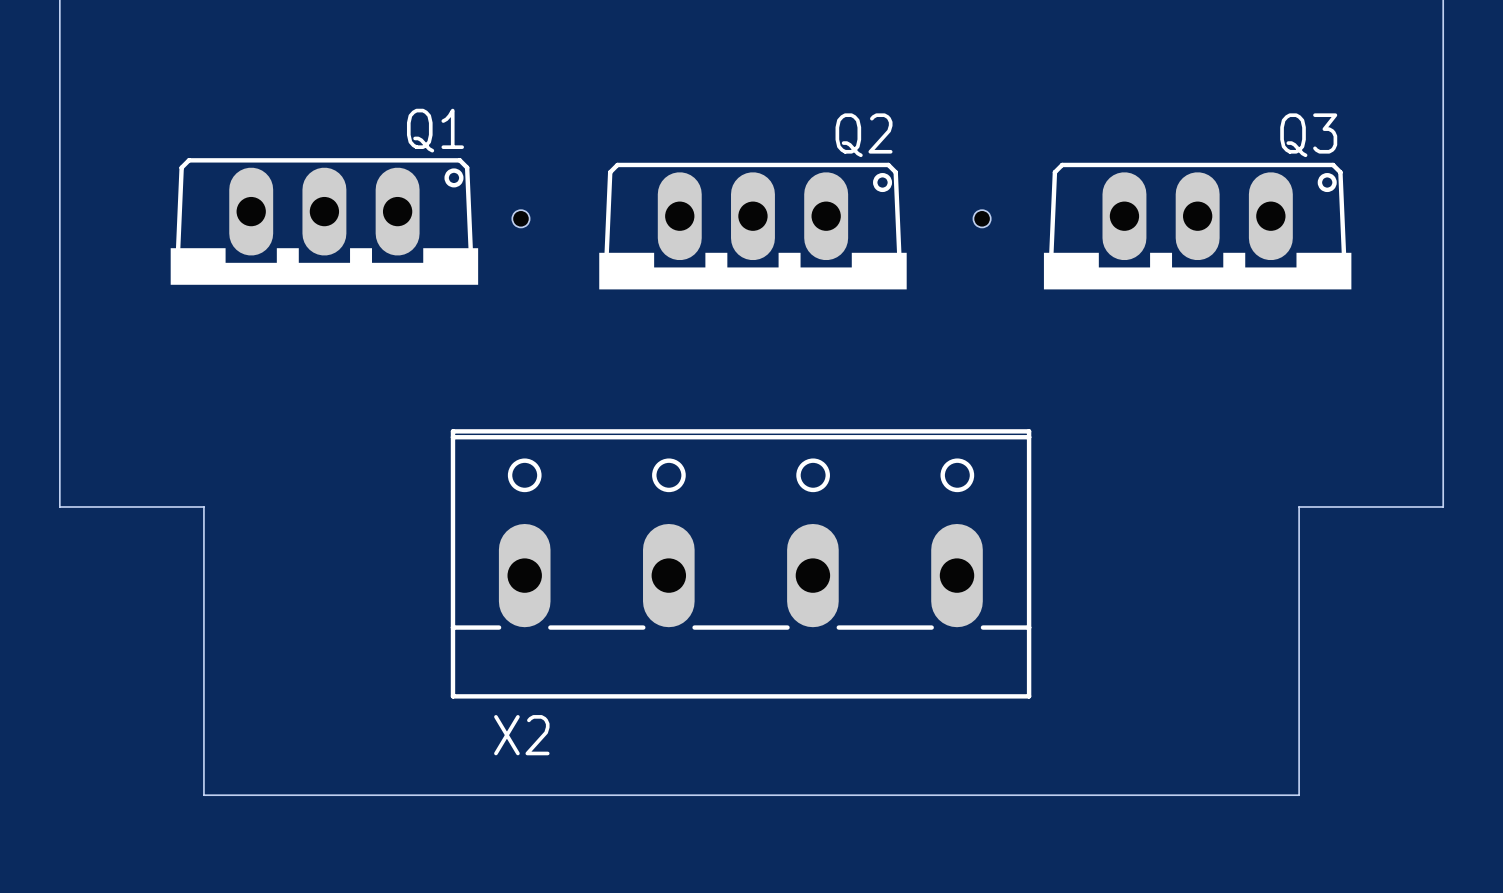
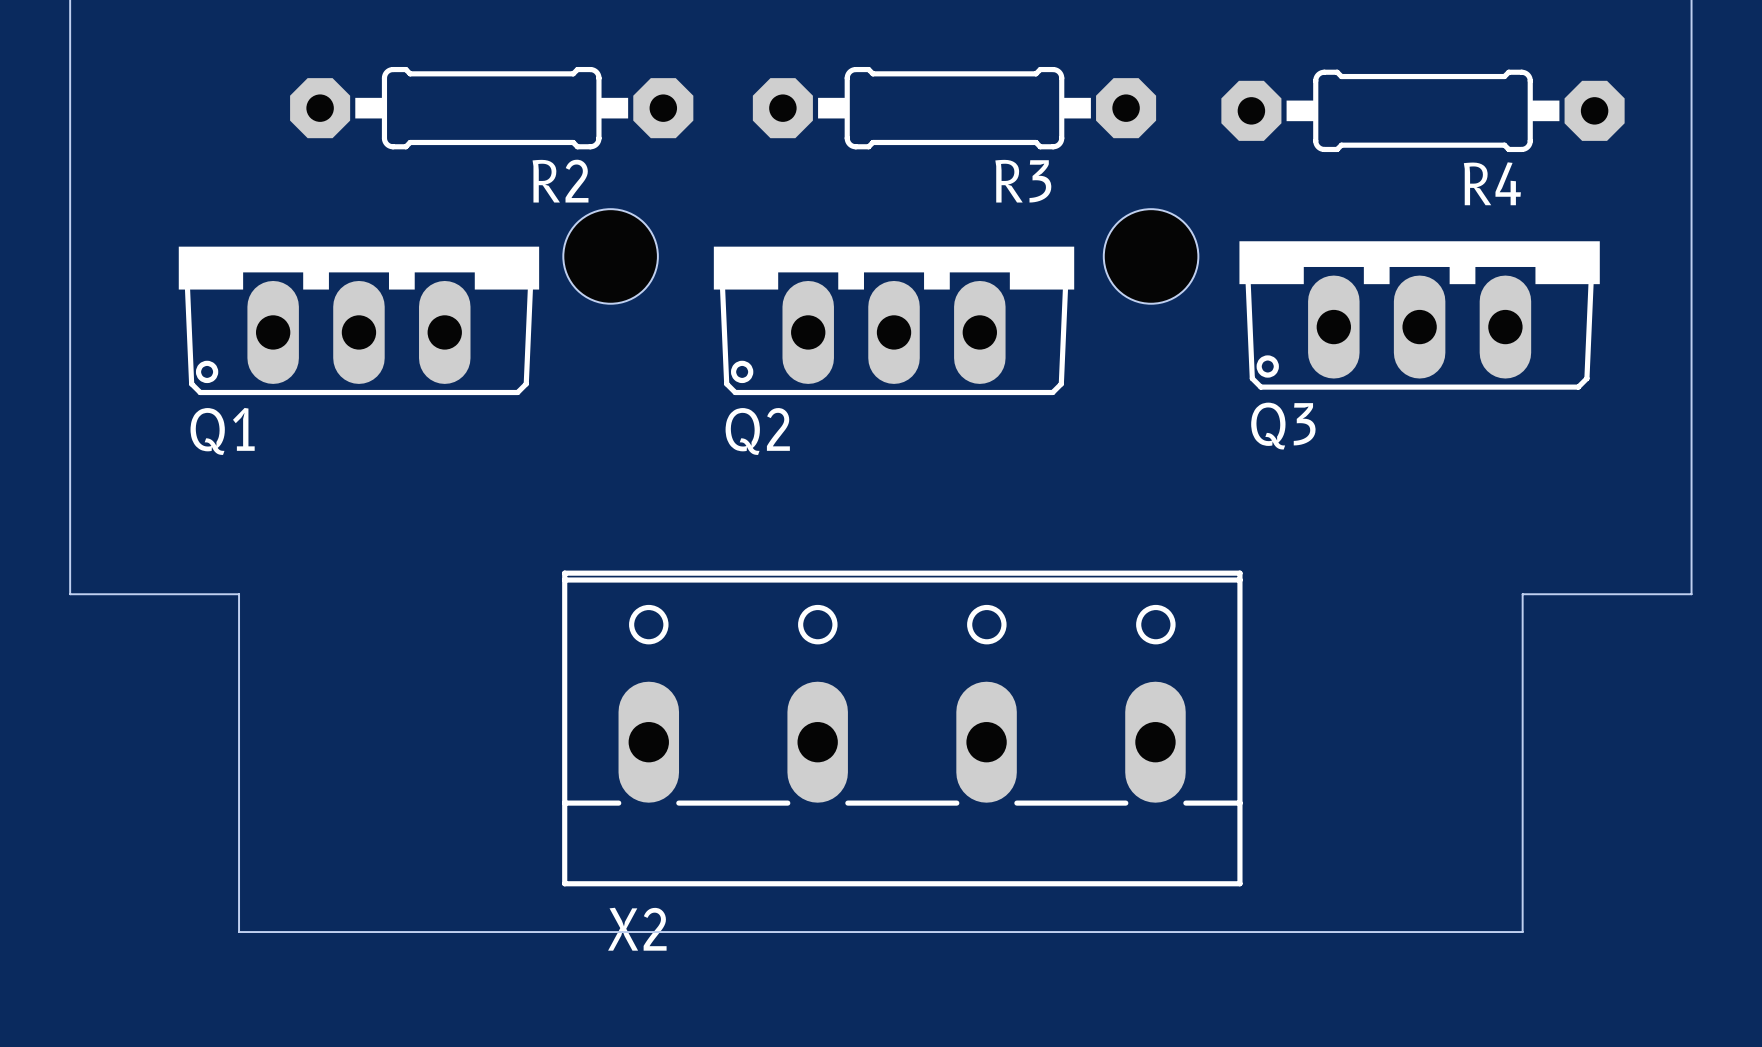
R2: none -> (491, 108)
R3: none -> (954, 108)
R4: none -> (1423, 110)
hole size: [512, 210, 530, 228] -> [563, 209, 658, 304]
hole size: [973, 210, 991, 228] -> [1103, 209, 1199, 304]
Q1 rotation: 0° (324, 221) -> 180° (358, 320)
Q2 rotation: 0° (752, 226) -> 180° (894, 320)
Q3 rotation: 0° (1197, 226) -> 180° (1419, 315)
X2 position: (741, 563) -> (902, 728)

